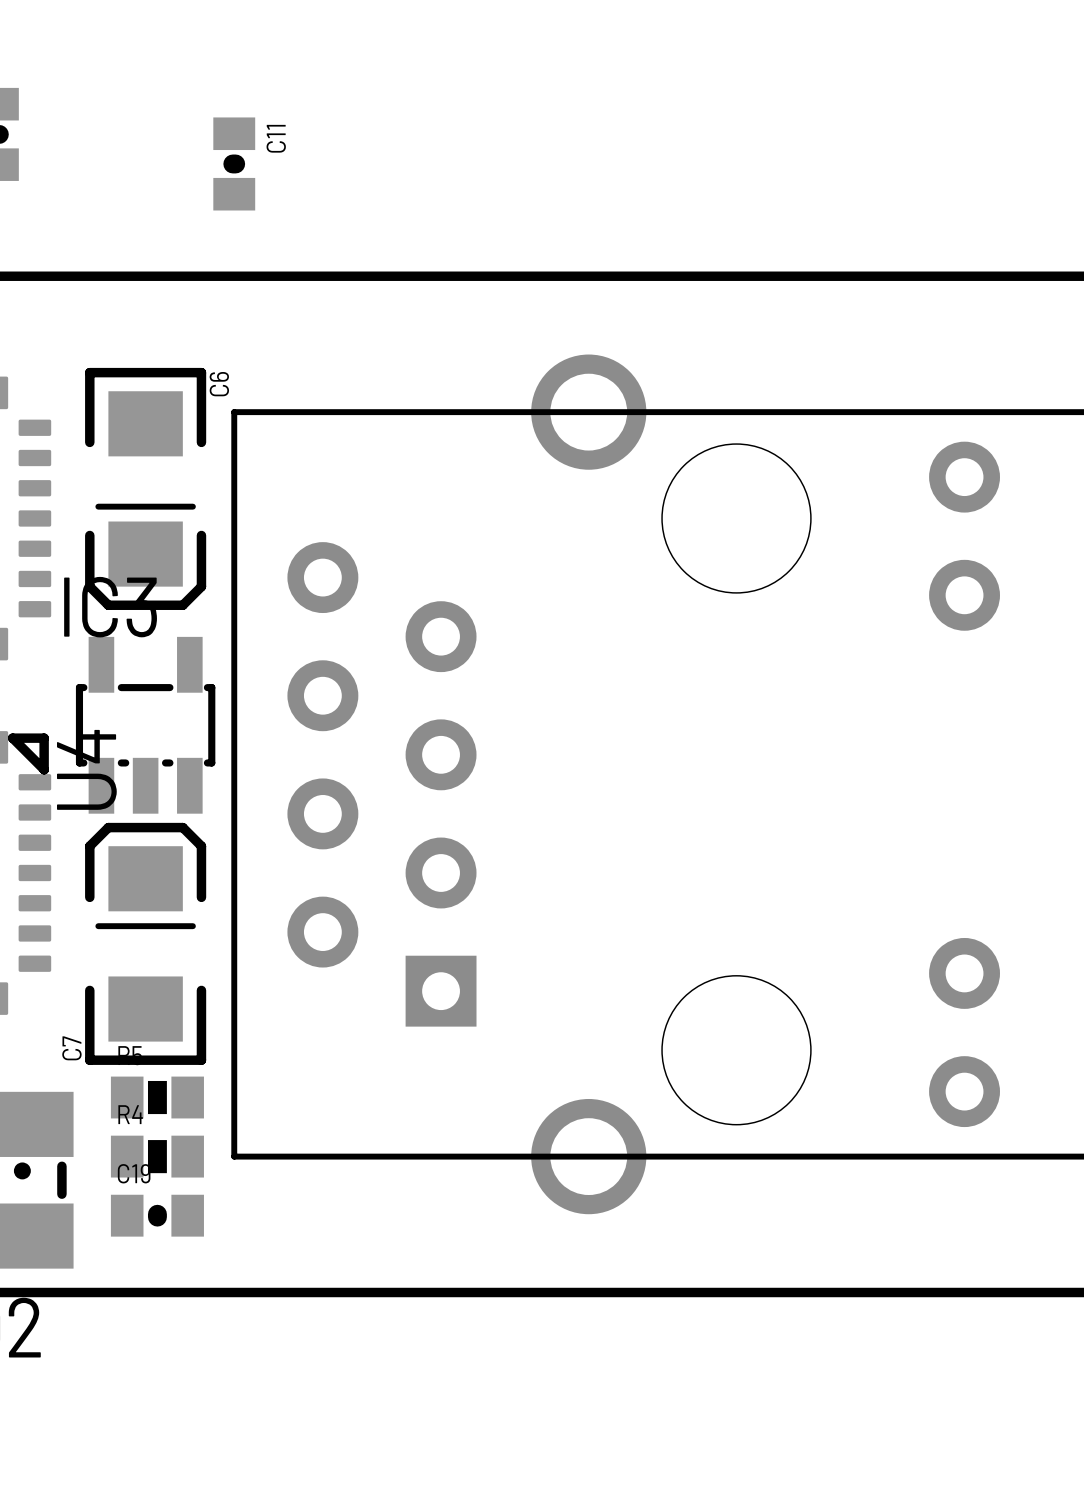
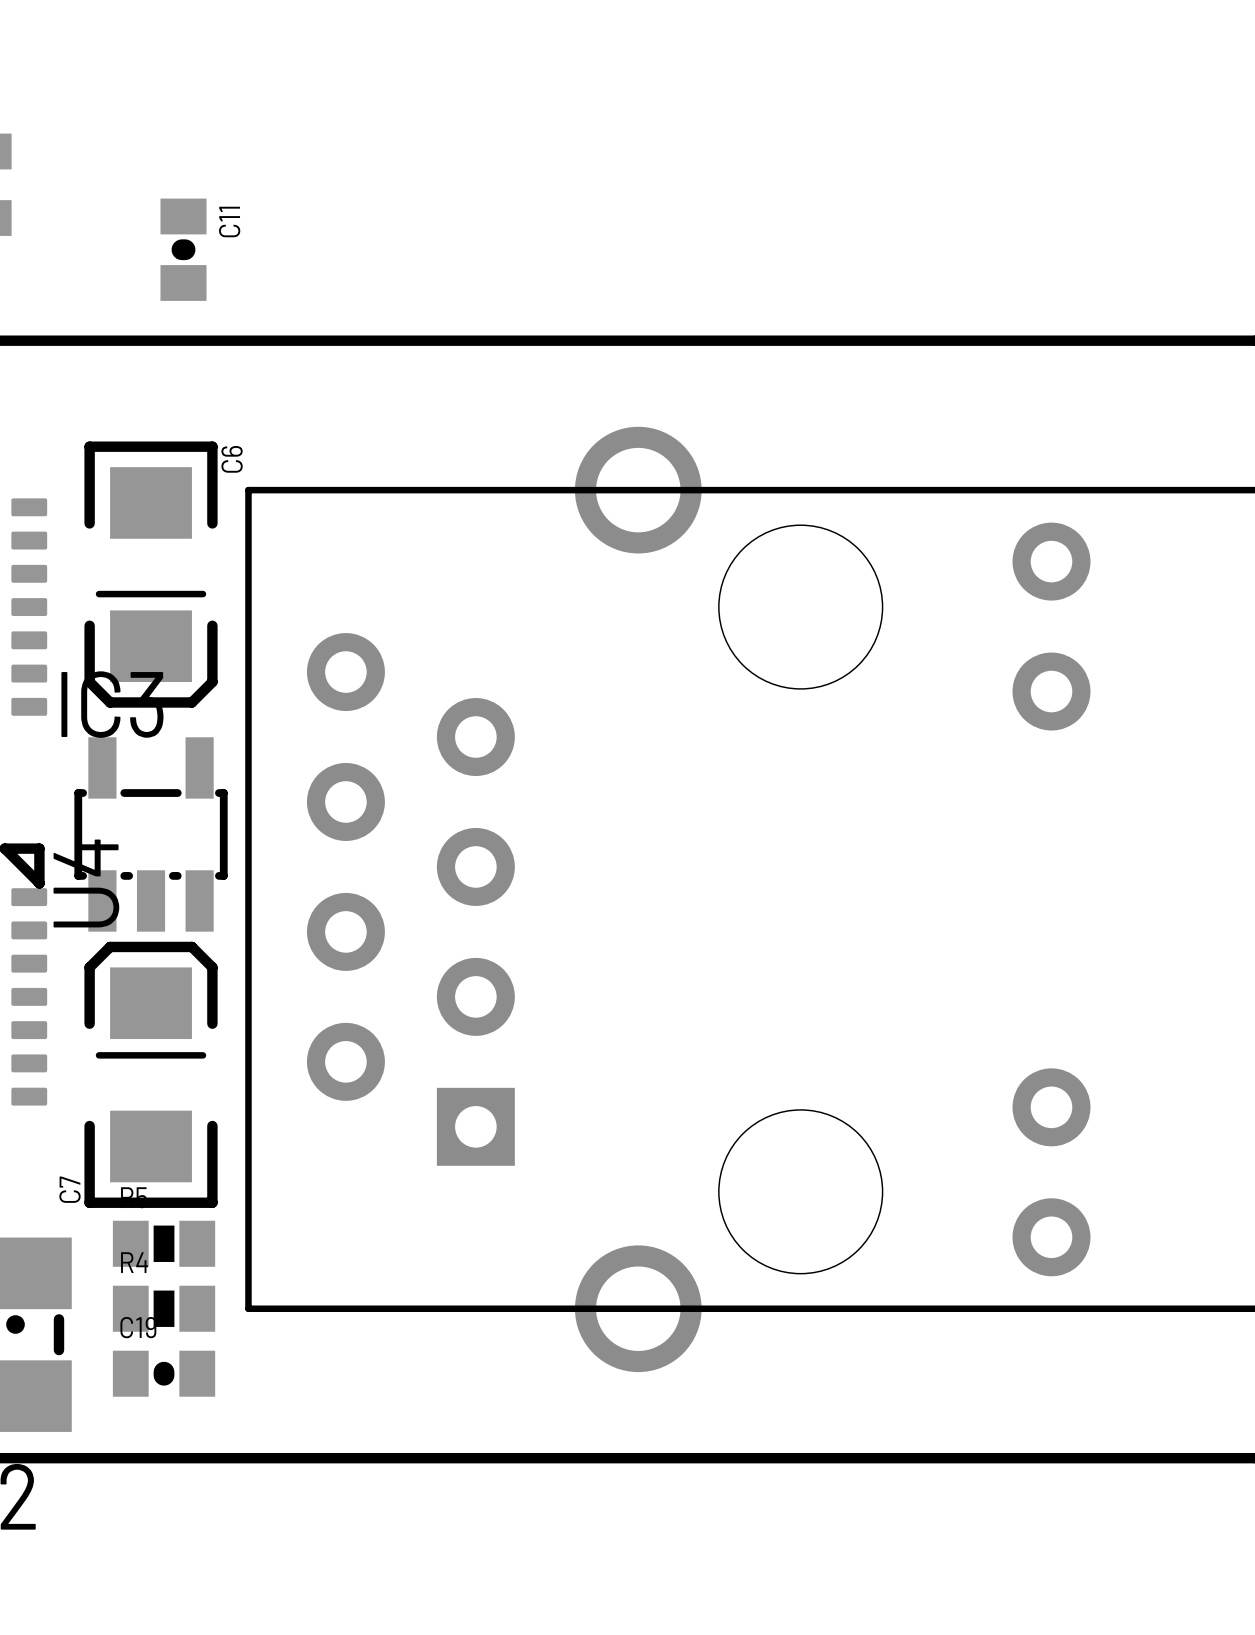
C11 position: (234, 163) -> (183, 249)

